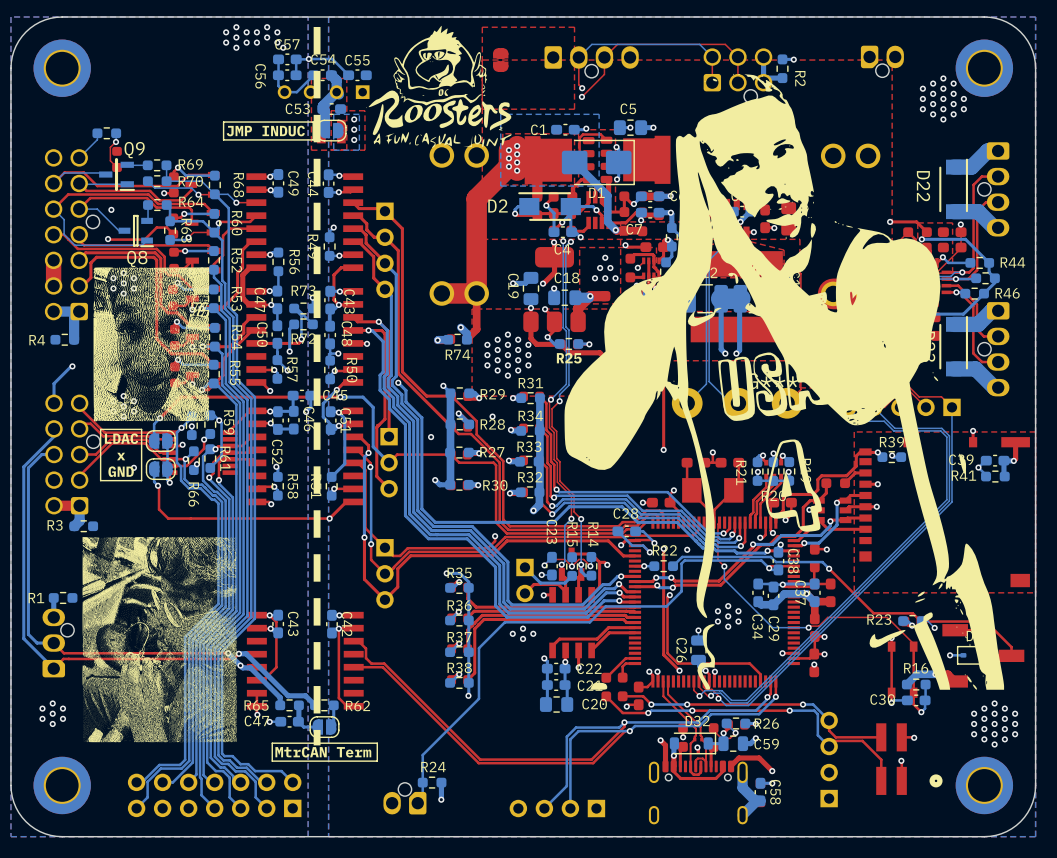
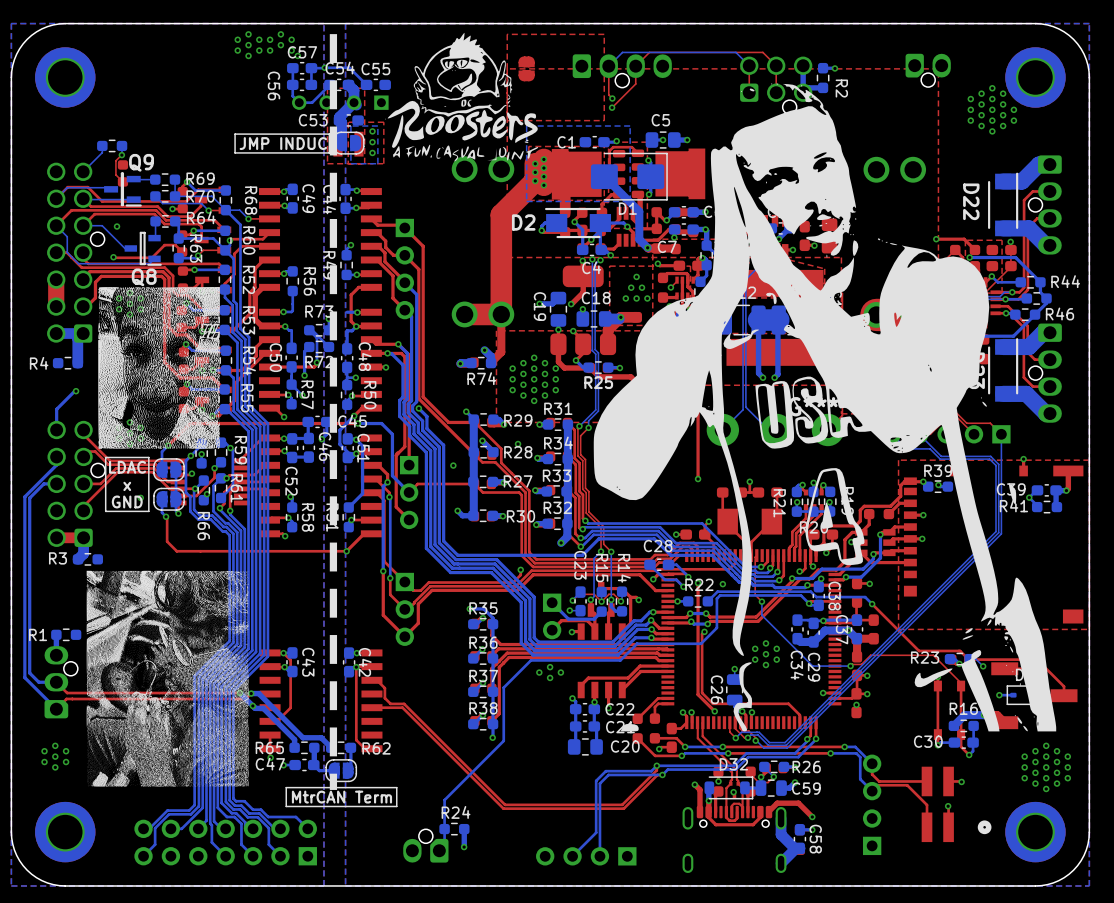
C47: (277, 299) -> none
C43: (330, 300) -> none

